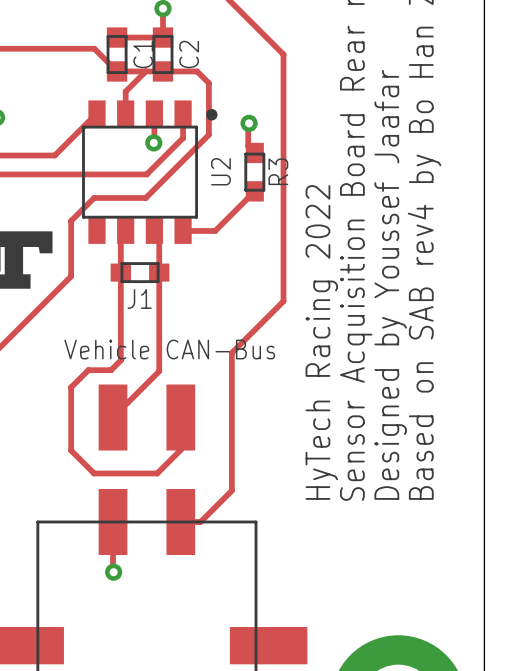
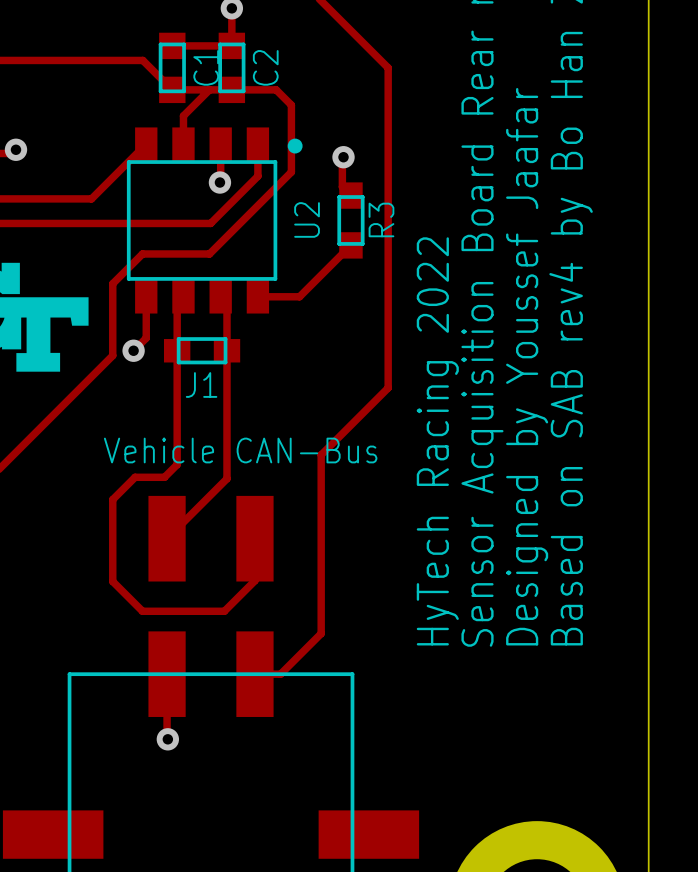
track: none -> (146, 296) (146, 338) (133, 350)
via: none -> (133, 350)

